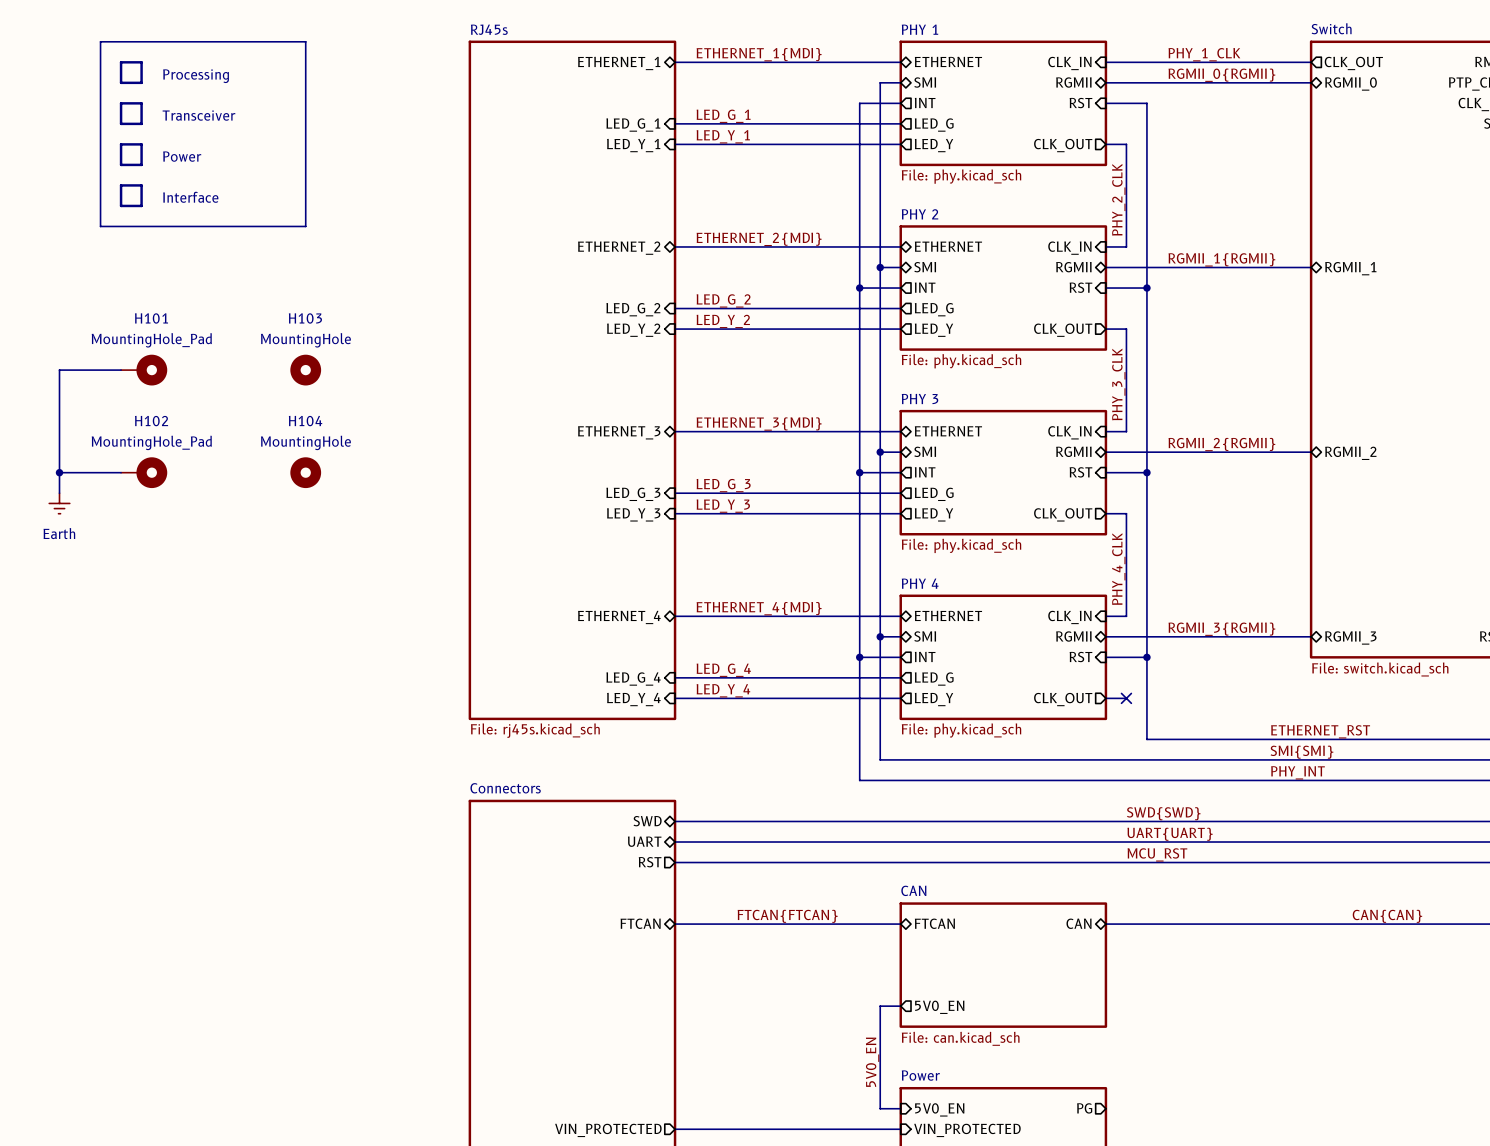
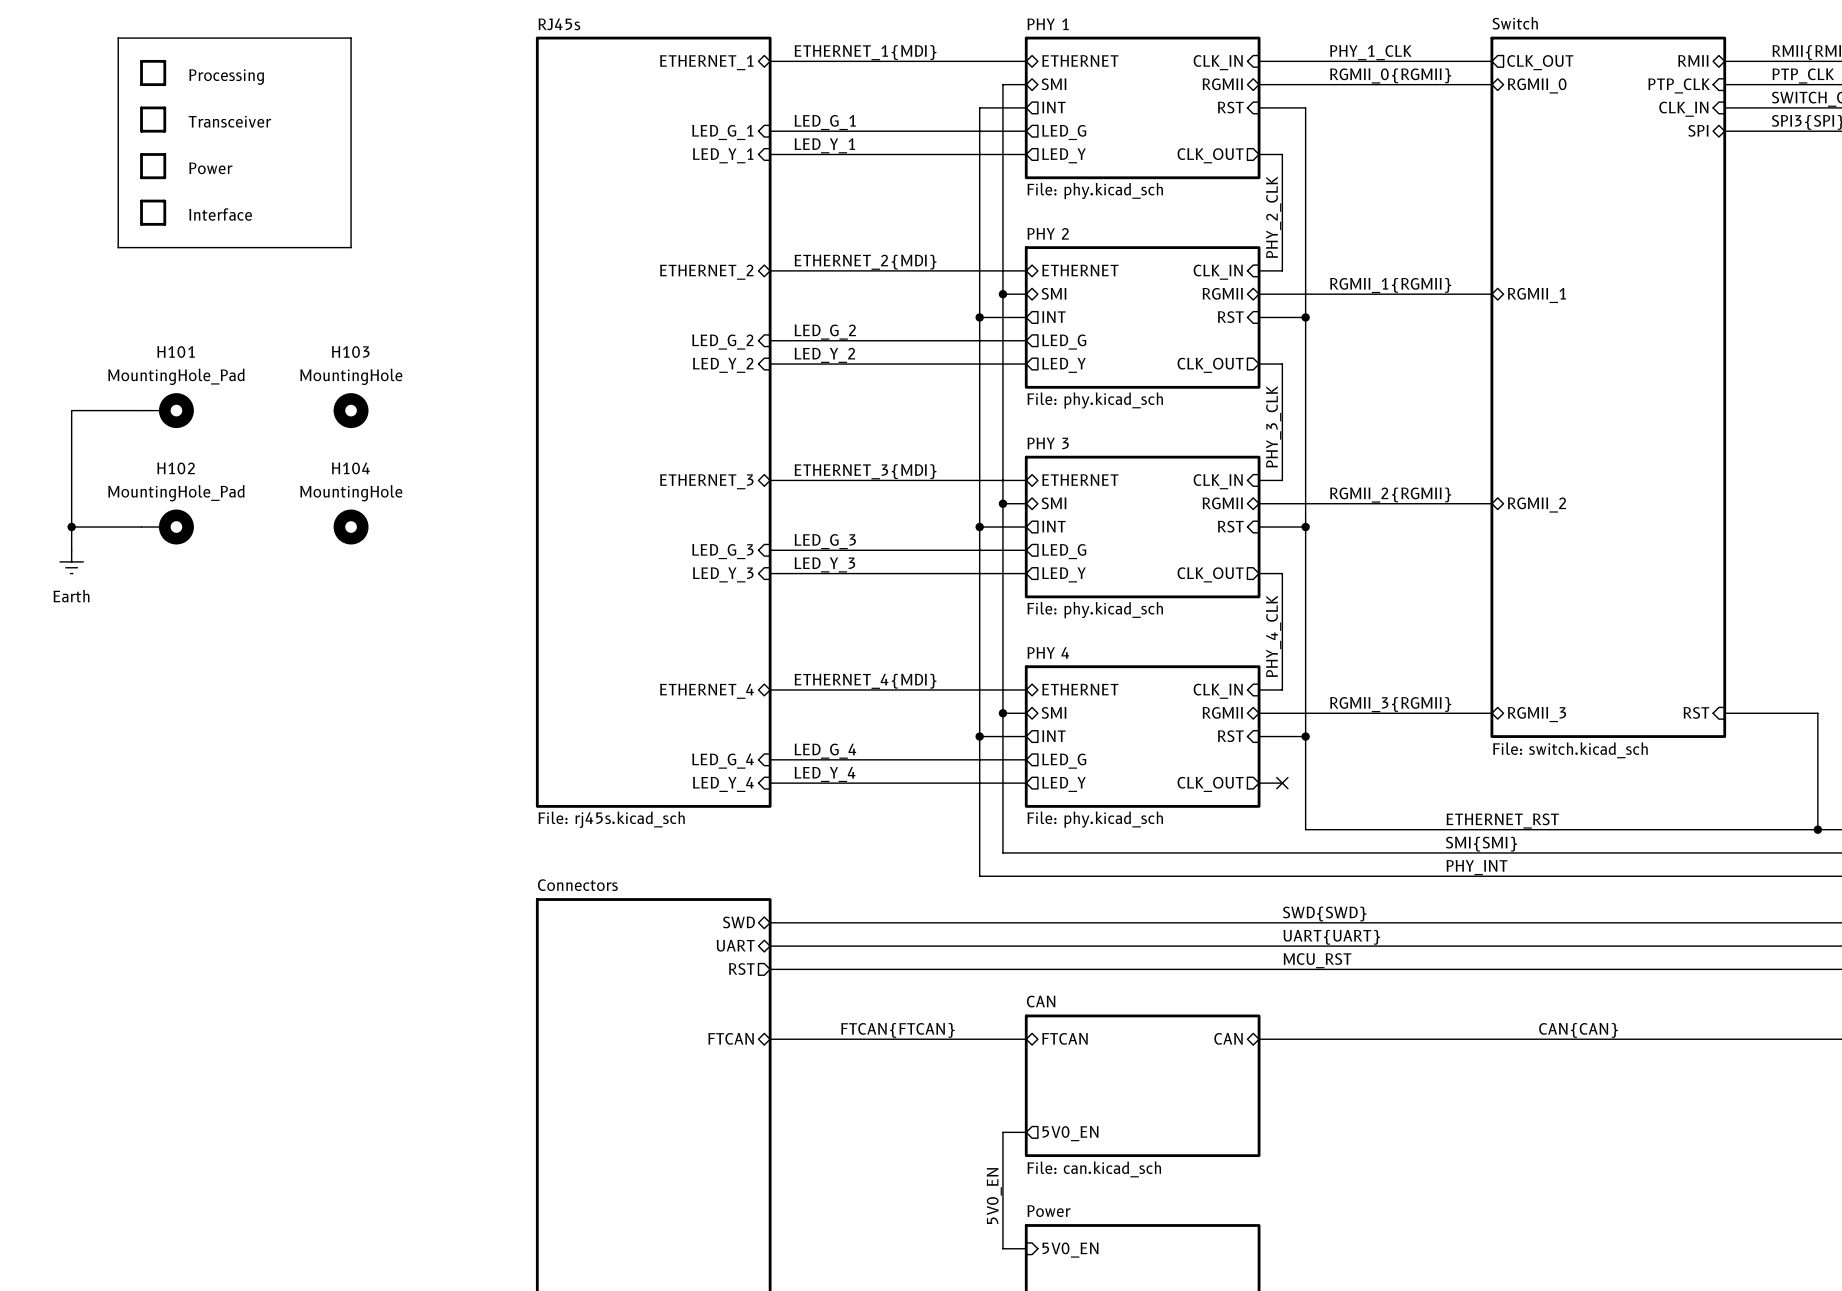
sheet pin: PG (1084, 1108) -> none
wire: (675, 1129) (900, 1129) -> none
sheet pin: VIN_PROTECTED (608, 1130) -> none
sheet pin: VIN_PROTECTED (967, 1130) -> none

